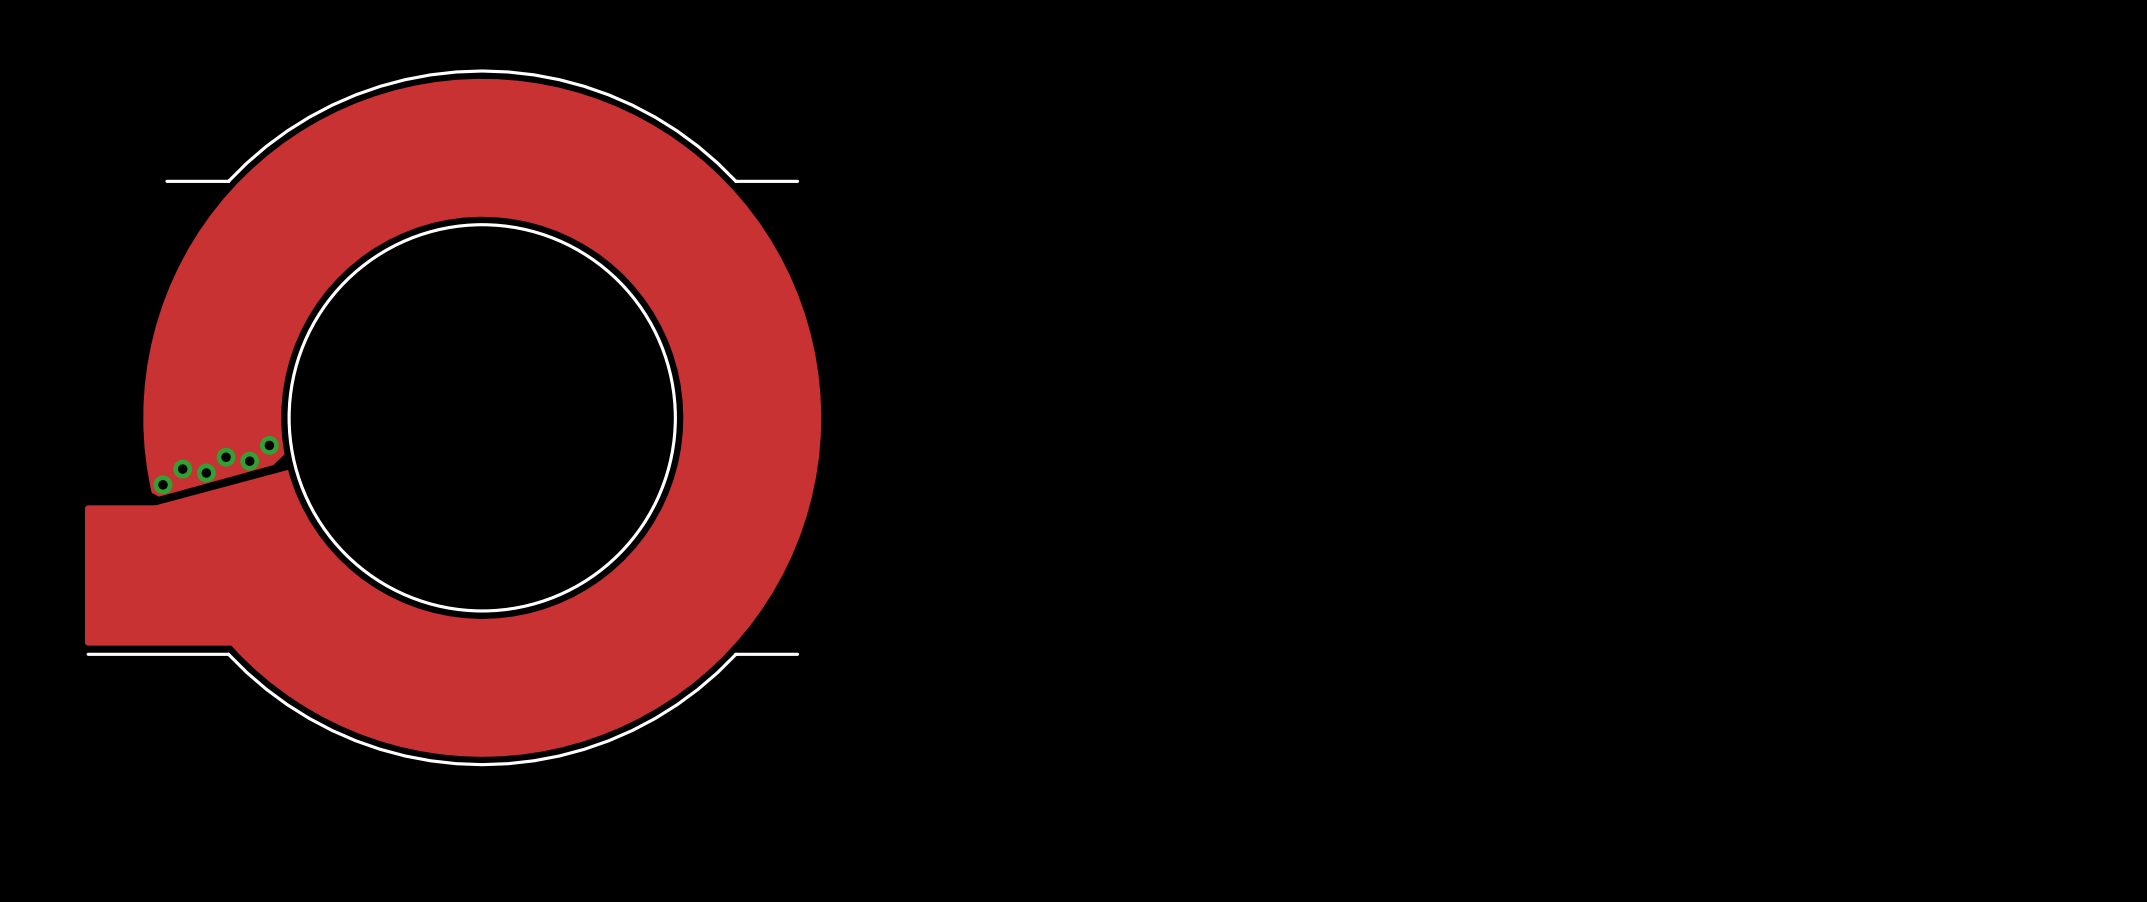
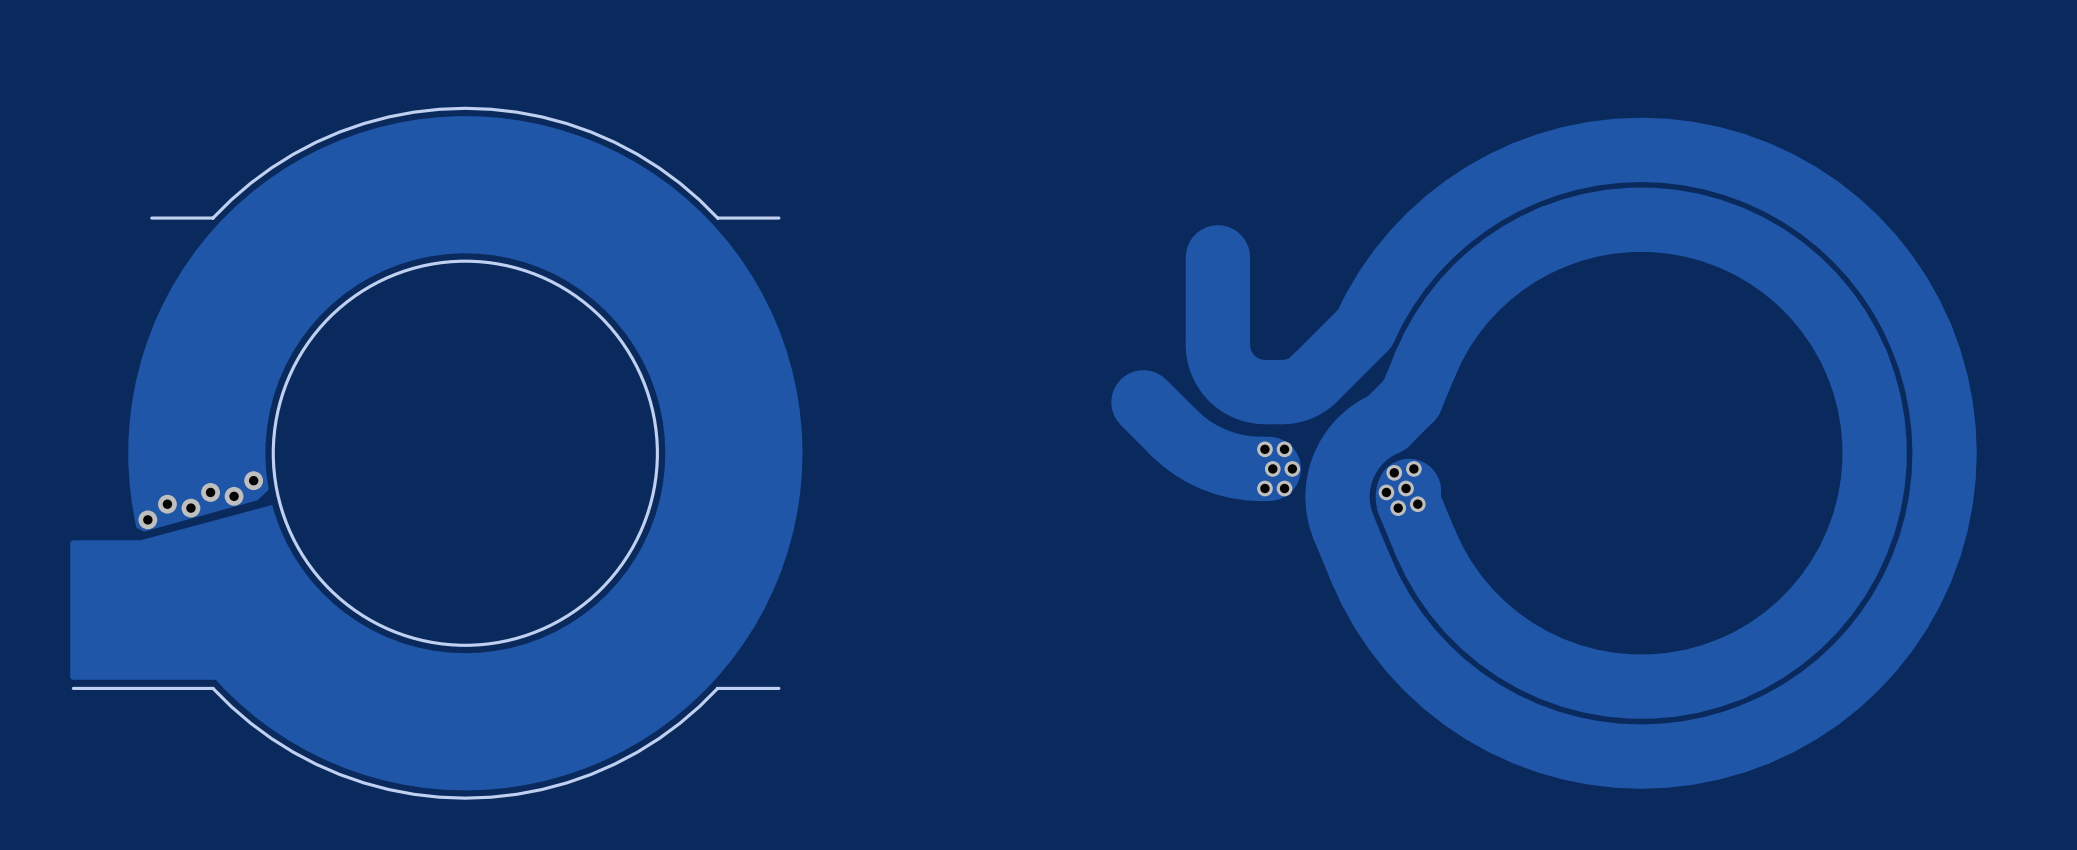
track: none -> (1217, 257) (1217, 345) (1219, 357) (1224, 368) (1236, 382) (1252, 390) (1291, 391) (1311, 381) (1364, 328) (1374, 308) (1399, 269) (1429, 235) (1465, 206) (1504, 182) (1547, 164) (1570, 158) (1617, 150) (1665, 150) (1712, 158) (1734, 164) (1778, 182) (1819, 207) (1855, 238) (1886, 274) (1911, 315) (1929, 359) (1940, 405) (1944, 453) (1943, 477) (1936, 524) (1921, 569) (1911, 590) (1886, 631) (1855, 667) (1838, 683) (1799, 711) (1778, 723) (1734, 741) (1688, 752) (1665, 755) (1617, 755) (1570, 748) (1525, 733) (1503, 723) (1462, 698) (1444, 683) (1410, 650) (1382, 611) (1370, 590) (1340, 517) (1337, 496) (1340, 476) (1348, 456) (1360, 440) (1386, 422) (1410, 398) (1433, 347) (1463, 301) (1503, 264) (1551, 237) (1590, 225) (1631, 219) (1651, 219) (1691, 225) (1730, 237) (1749, 246) (1783, 267) (1799, 281) (1813, 295) (1838, 327) (1857, 363) (1869, 402) (1872, 422) (1874, 443) (1872, 483) (1863, 523) (1856, 542) (1838, 578) (1826, 595) (1798, 625) (1783, 638) (1749, 660) (1711, 676) (1671, 684) (1651, 686) (1631, 686) (1590, 681) (1571, 675) (1533, 660) (1499, 638) (1483, 625) (1455, 595) (1434, 561) (1425, 542) (1408, 501) (1409, 490)
track: none -> (1143, 402) (1182, 440) (1203, 454) (1237, 466) (1268, 468)
via: none -> (1264, 449)
via: none -> (1284, 449)
via: none -> (1272, 468)
via: none -> (1292, 468)
via: none -> (1413, 468)
via: none -> (1394, 472)
via: none -> (1264, 488)
via: none -> (1284, 488)
via: none -> (1406, 488)
via: none -> (1386, 492)
via: none -> (1417, 504)
via: none -> (1398, 508)

